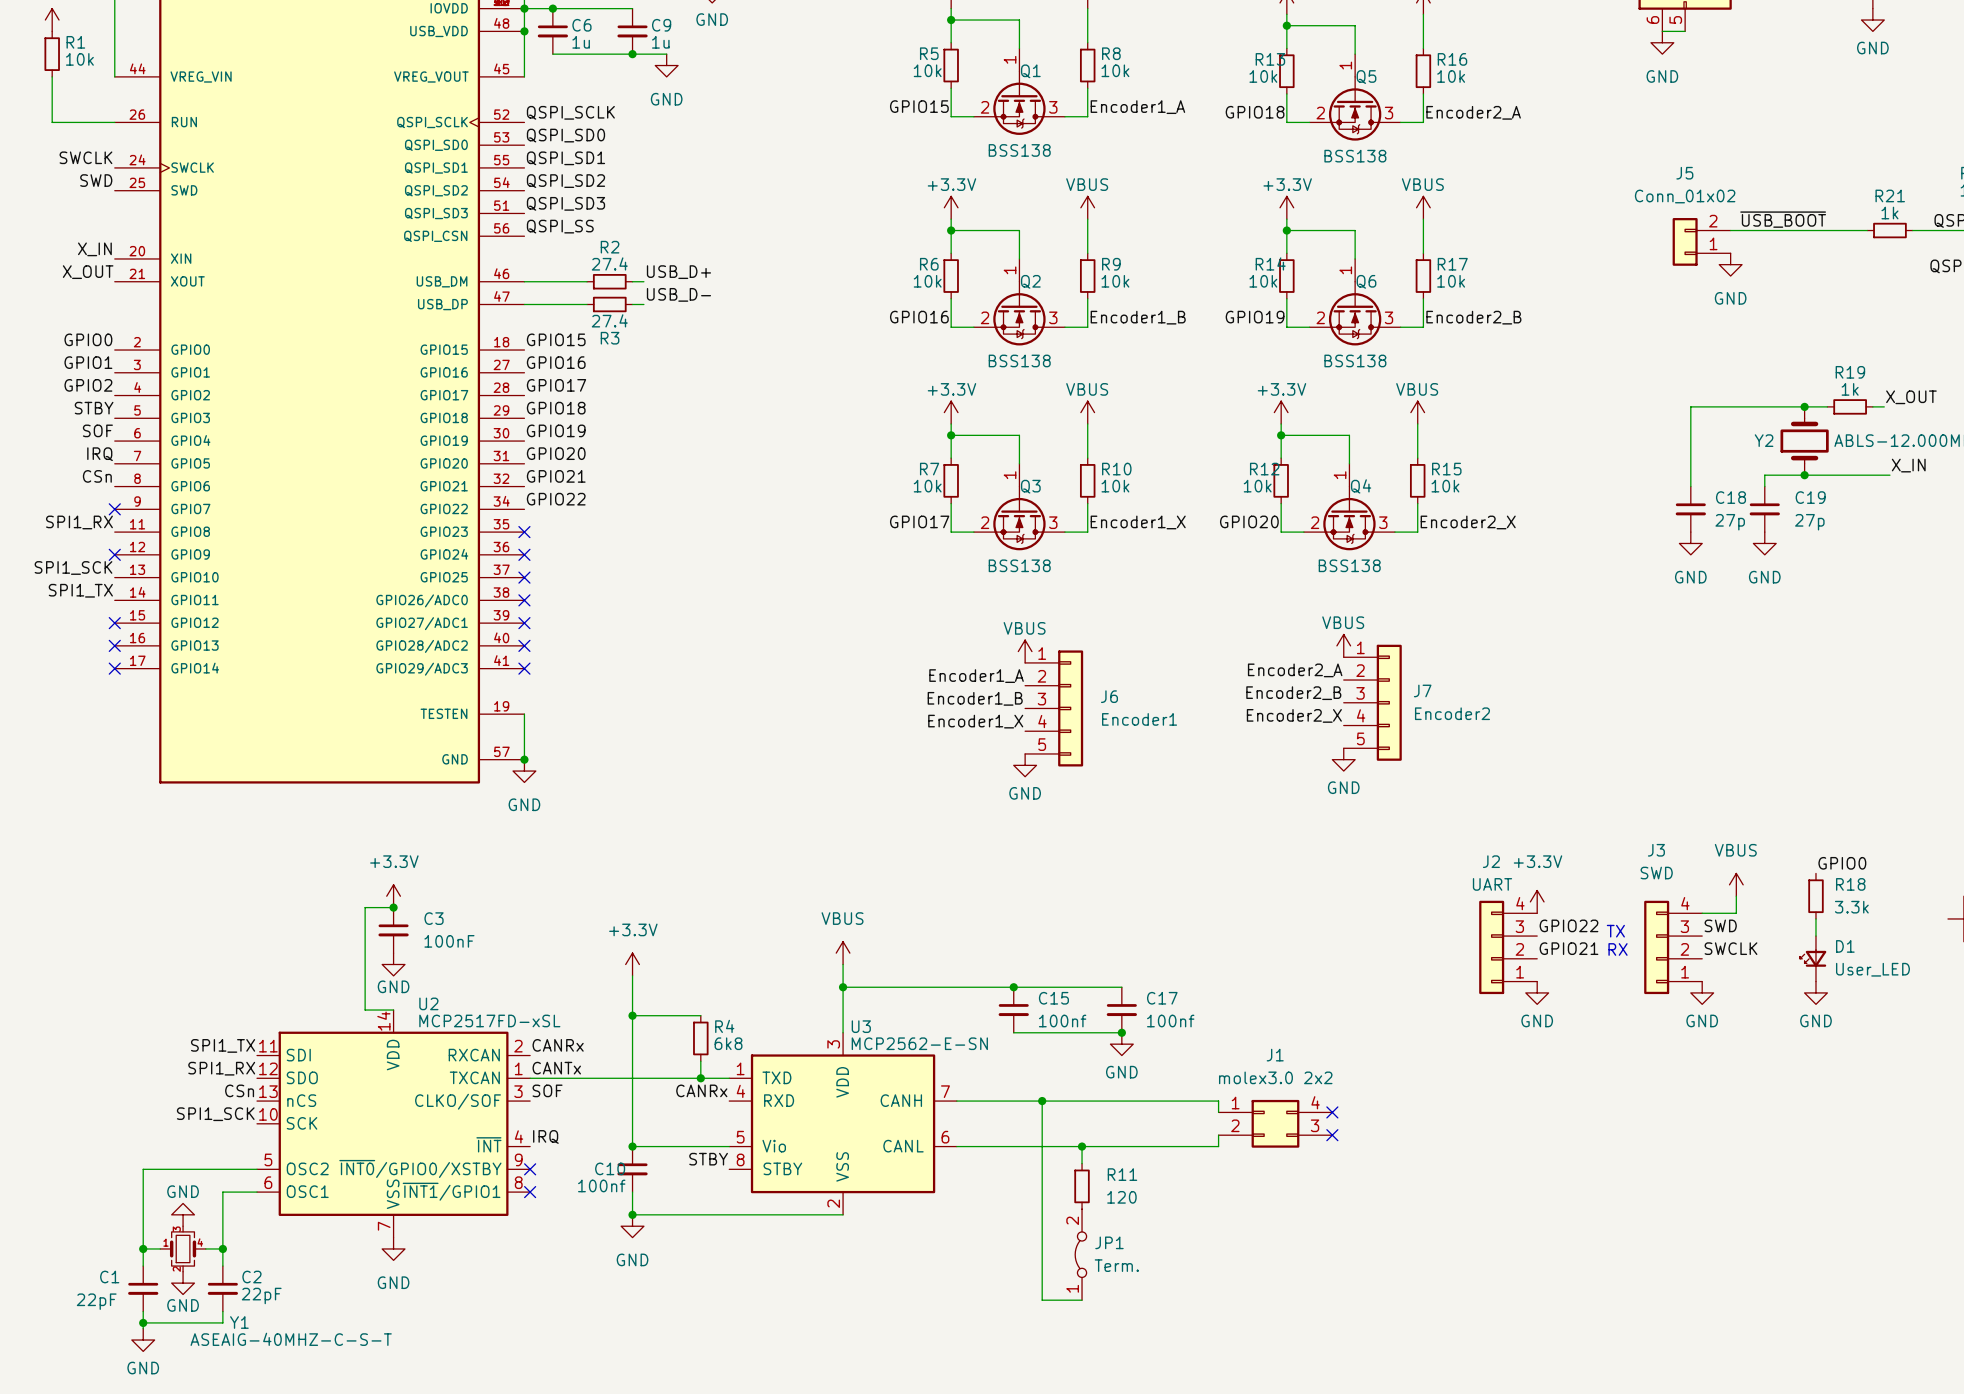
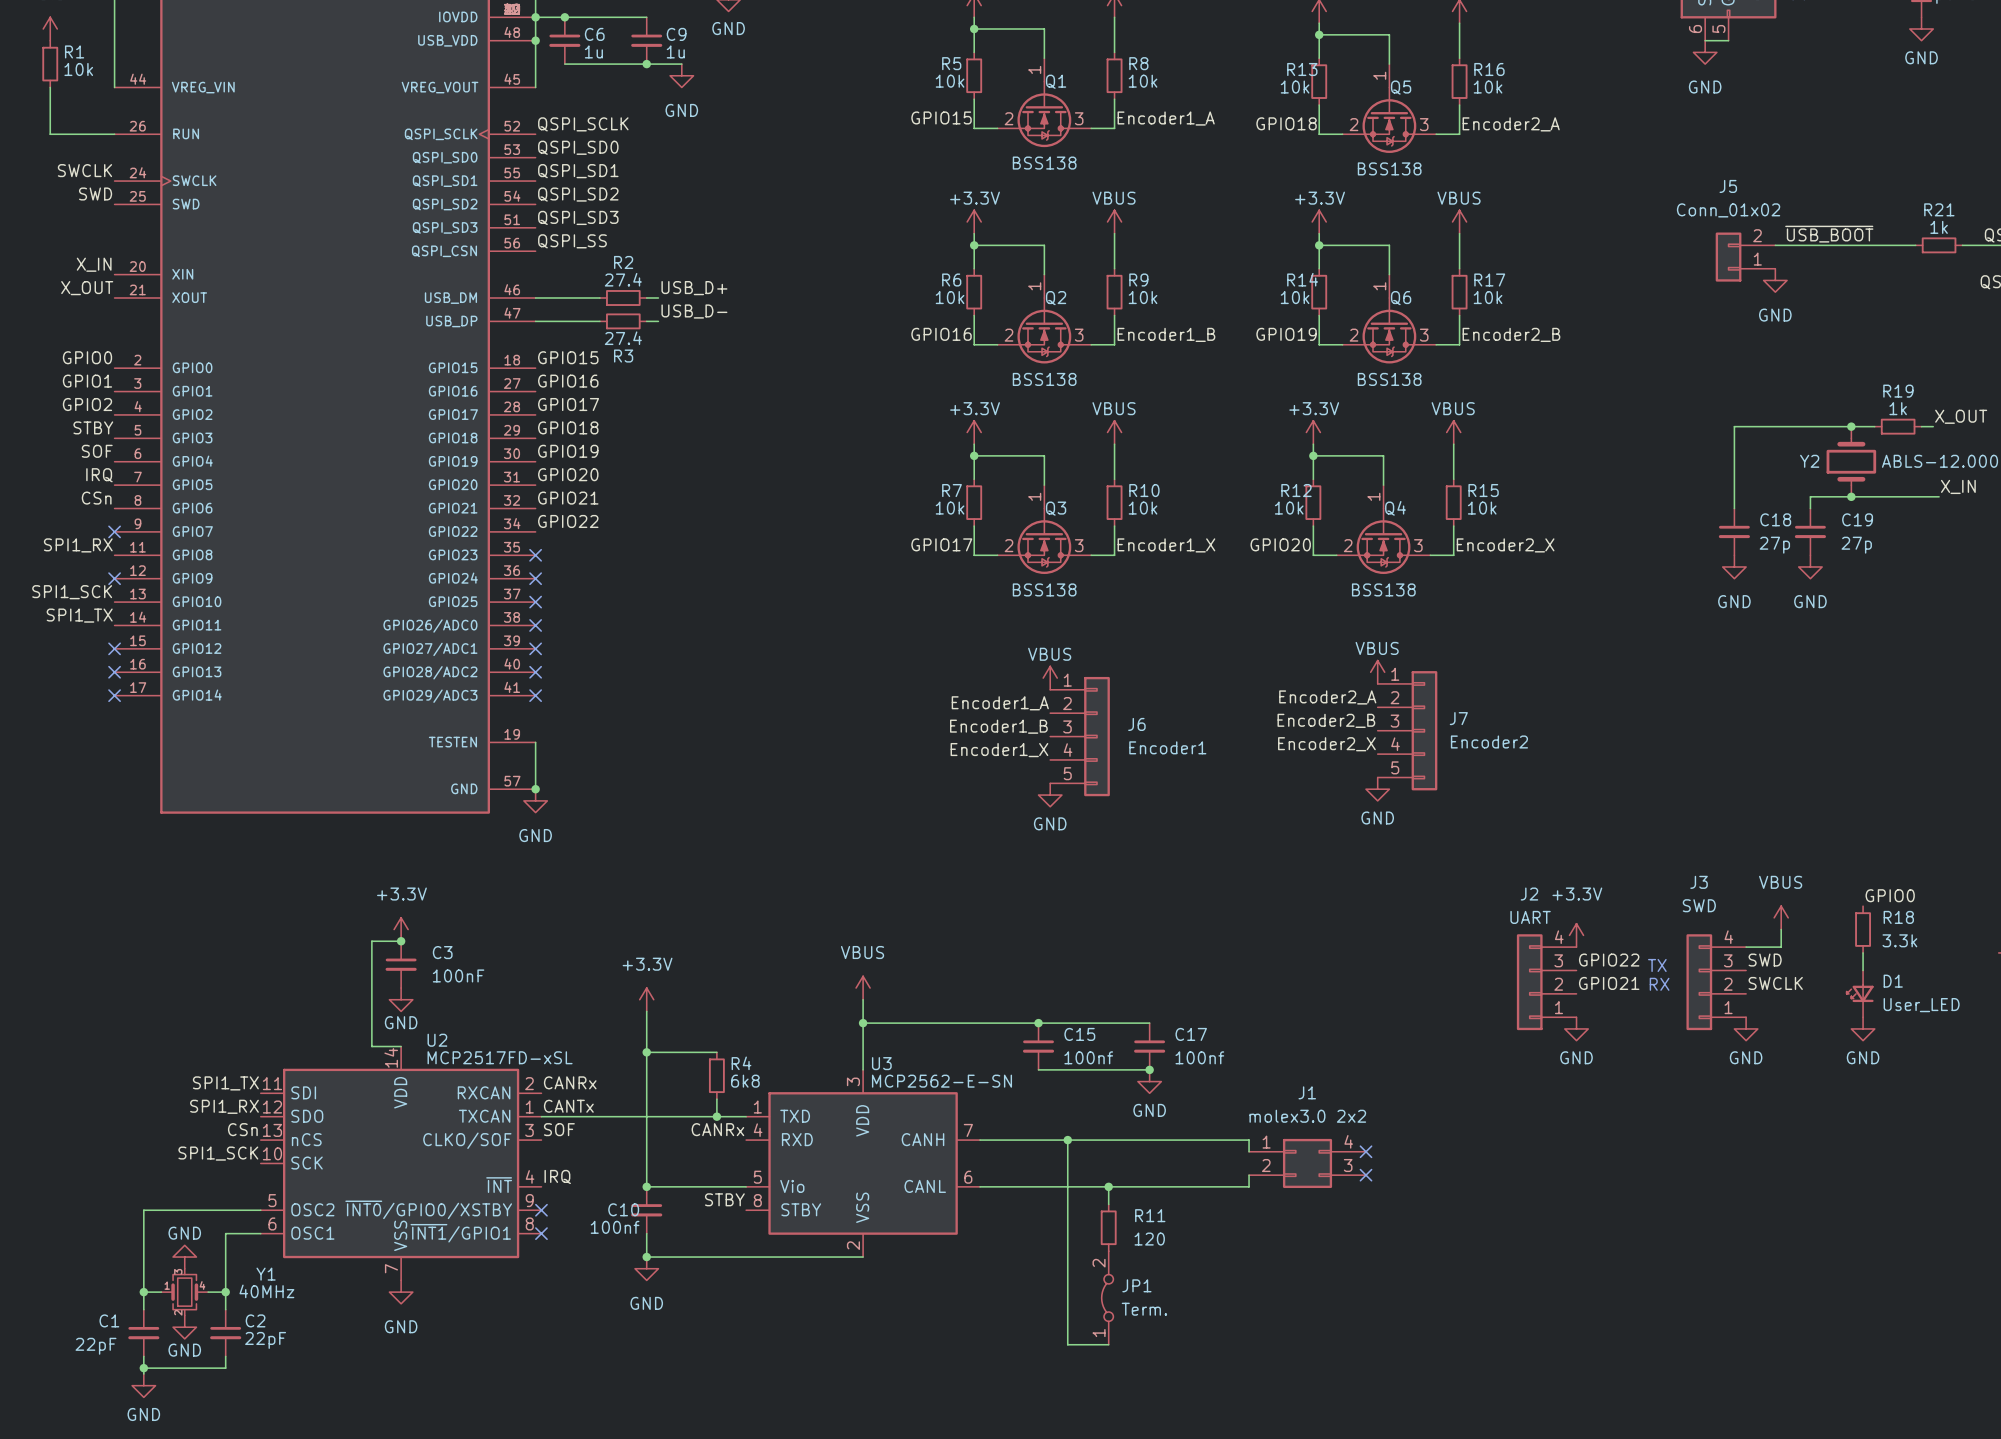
Y1 name position: Y1 (239, 1322) -> Y1 (266, 1274)
Y1 value: ASEAIG-40MHZ-C-S-T (291, 1339) -> 40MHz (266, 1291)

